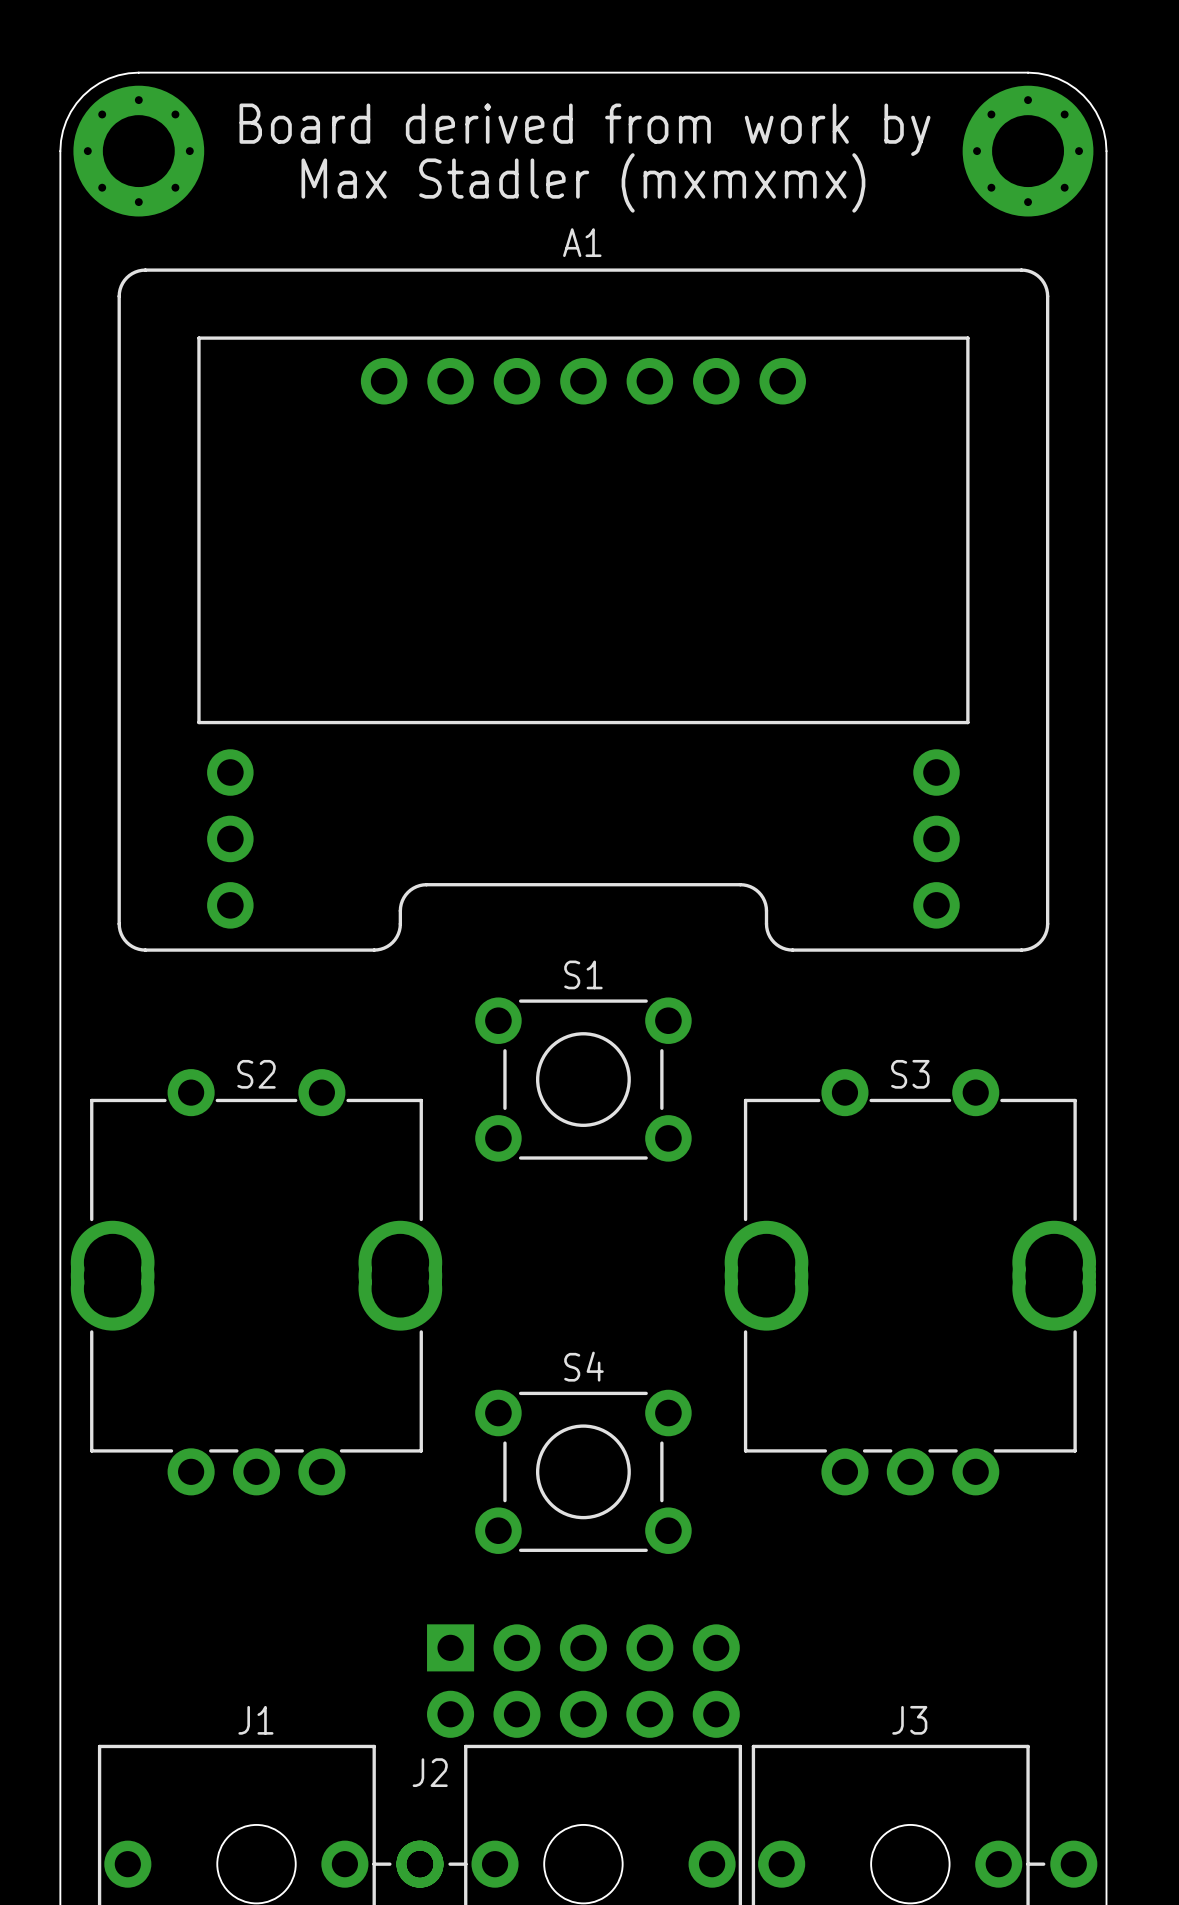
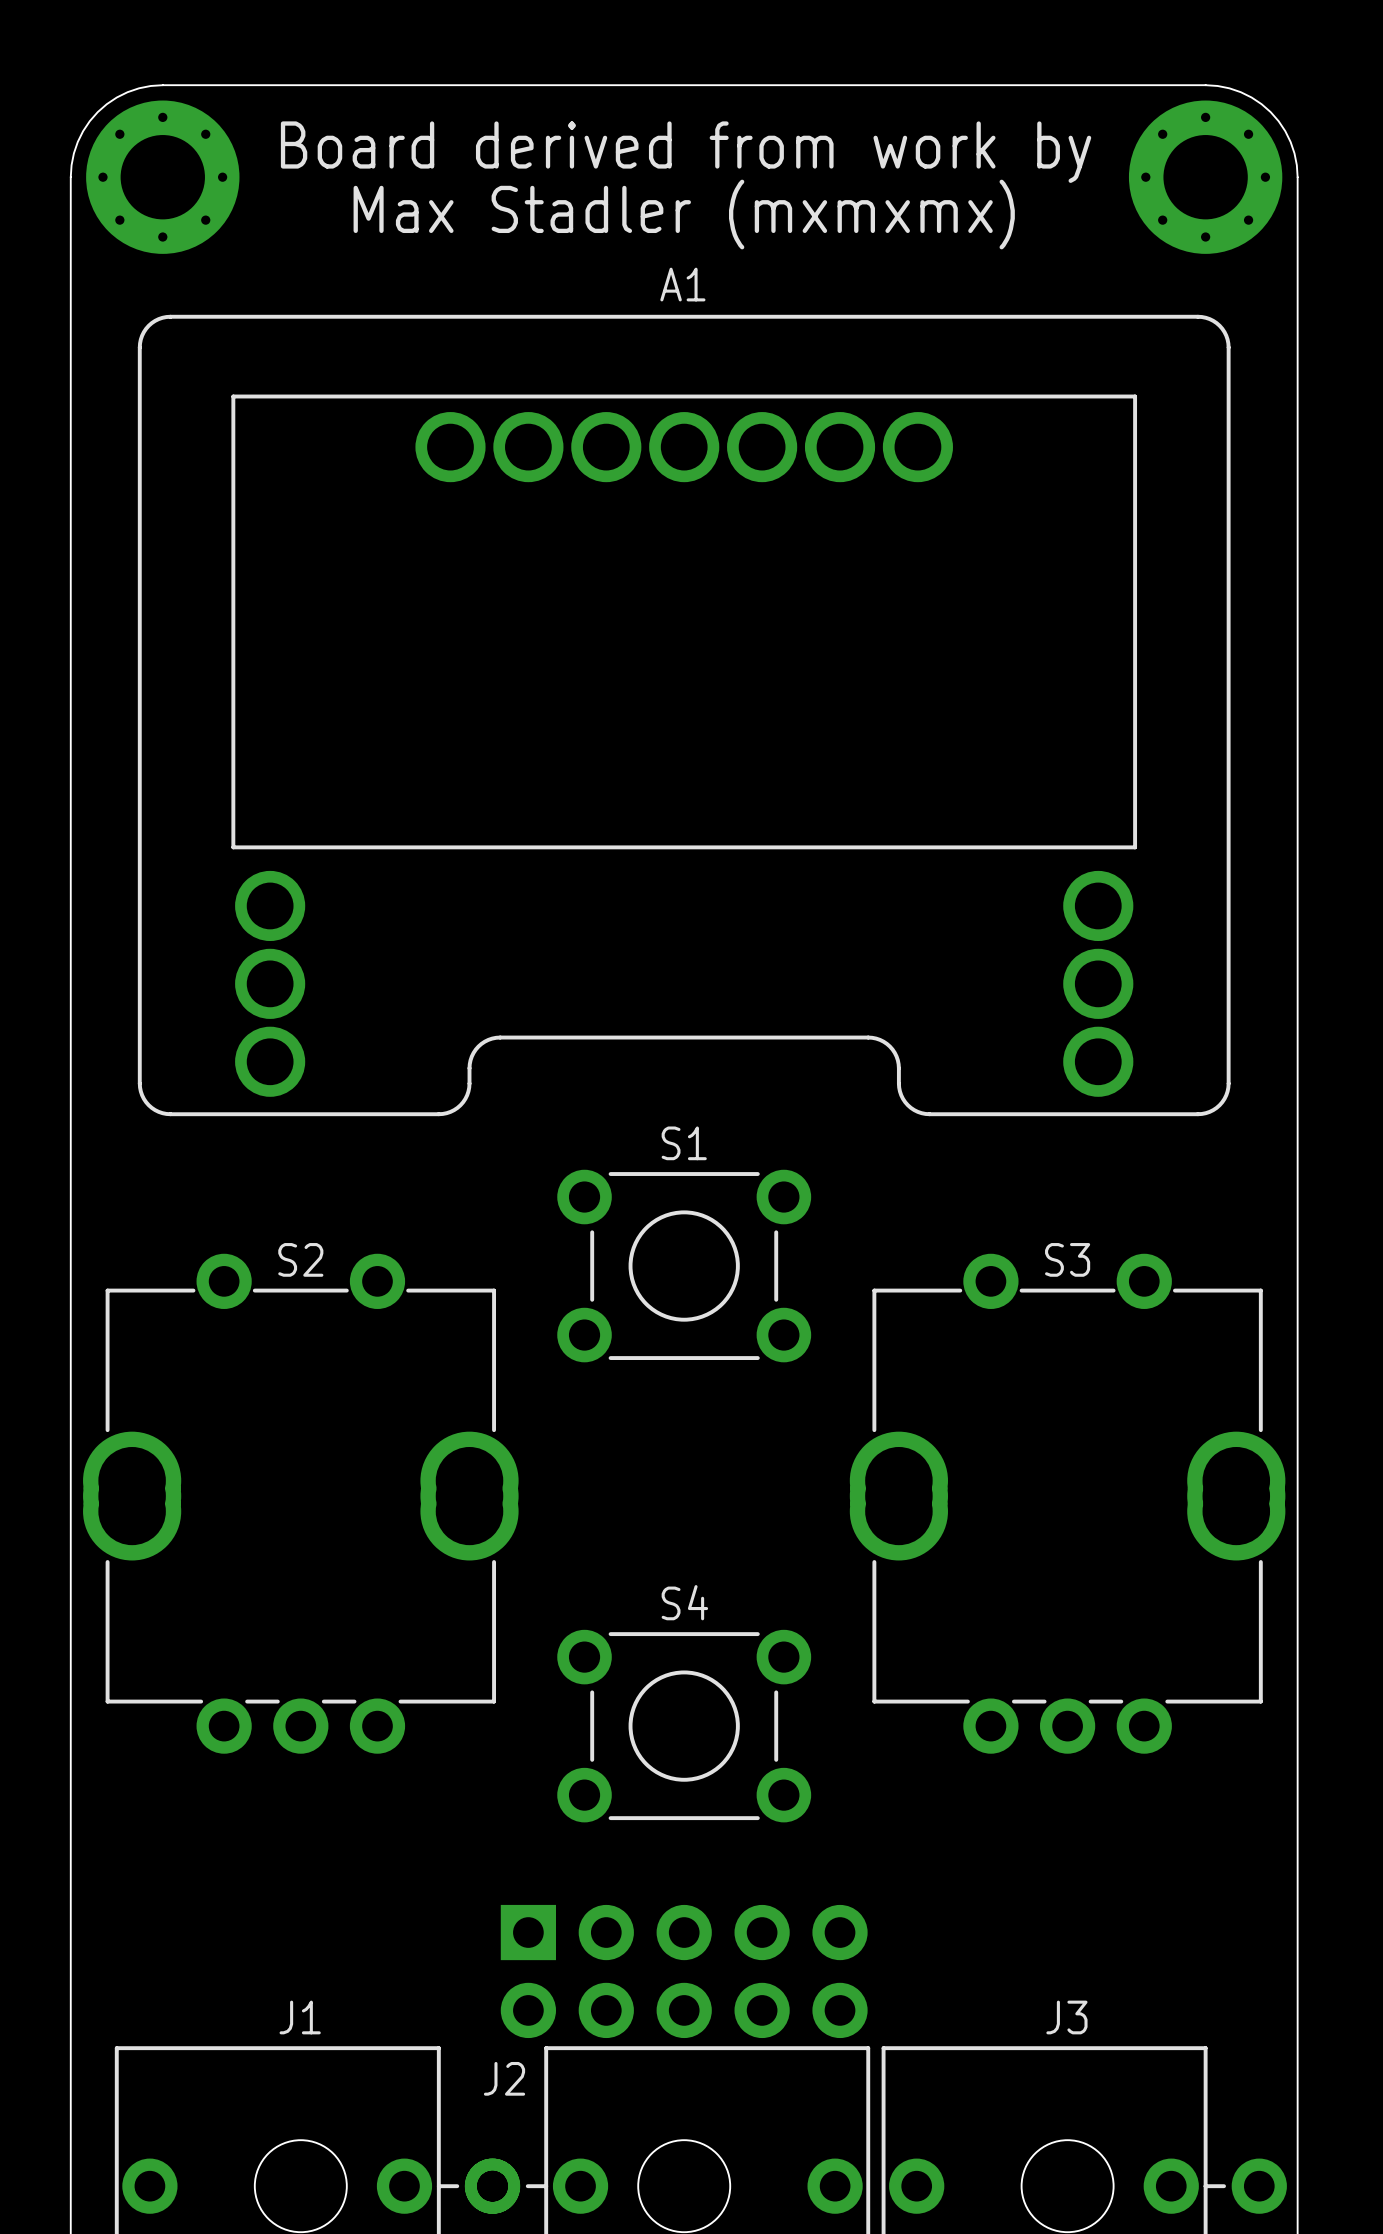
A1 footprint: [117, 268, 1050, 952] -> [137, 314, 1231, 1117]

